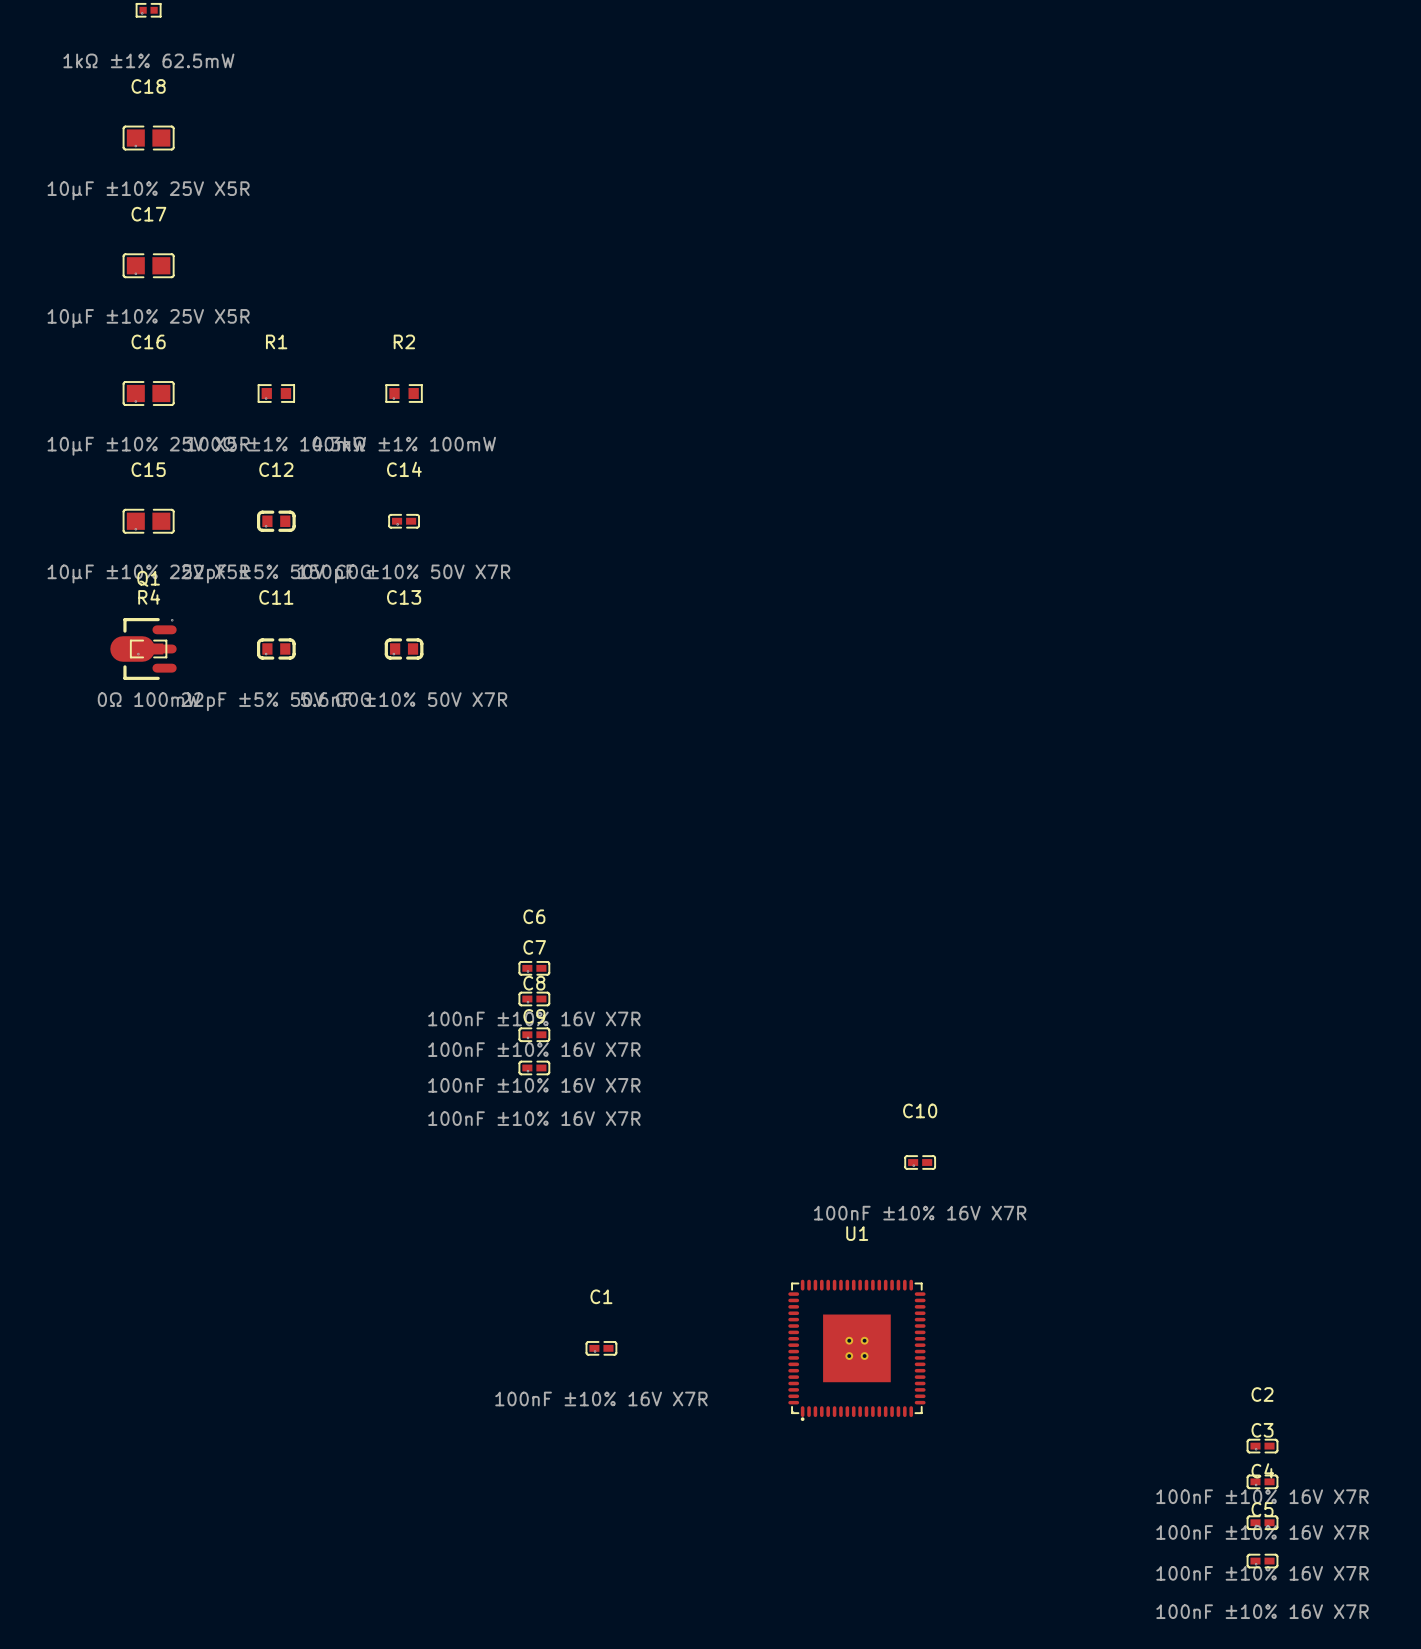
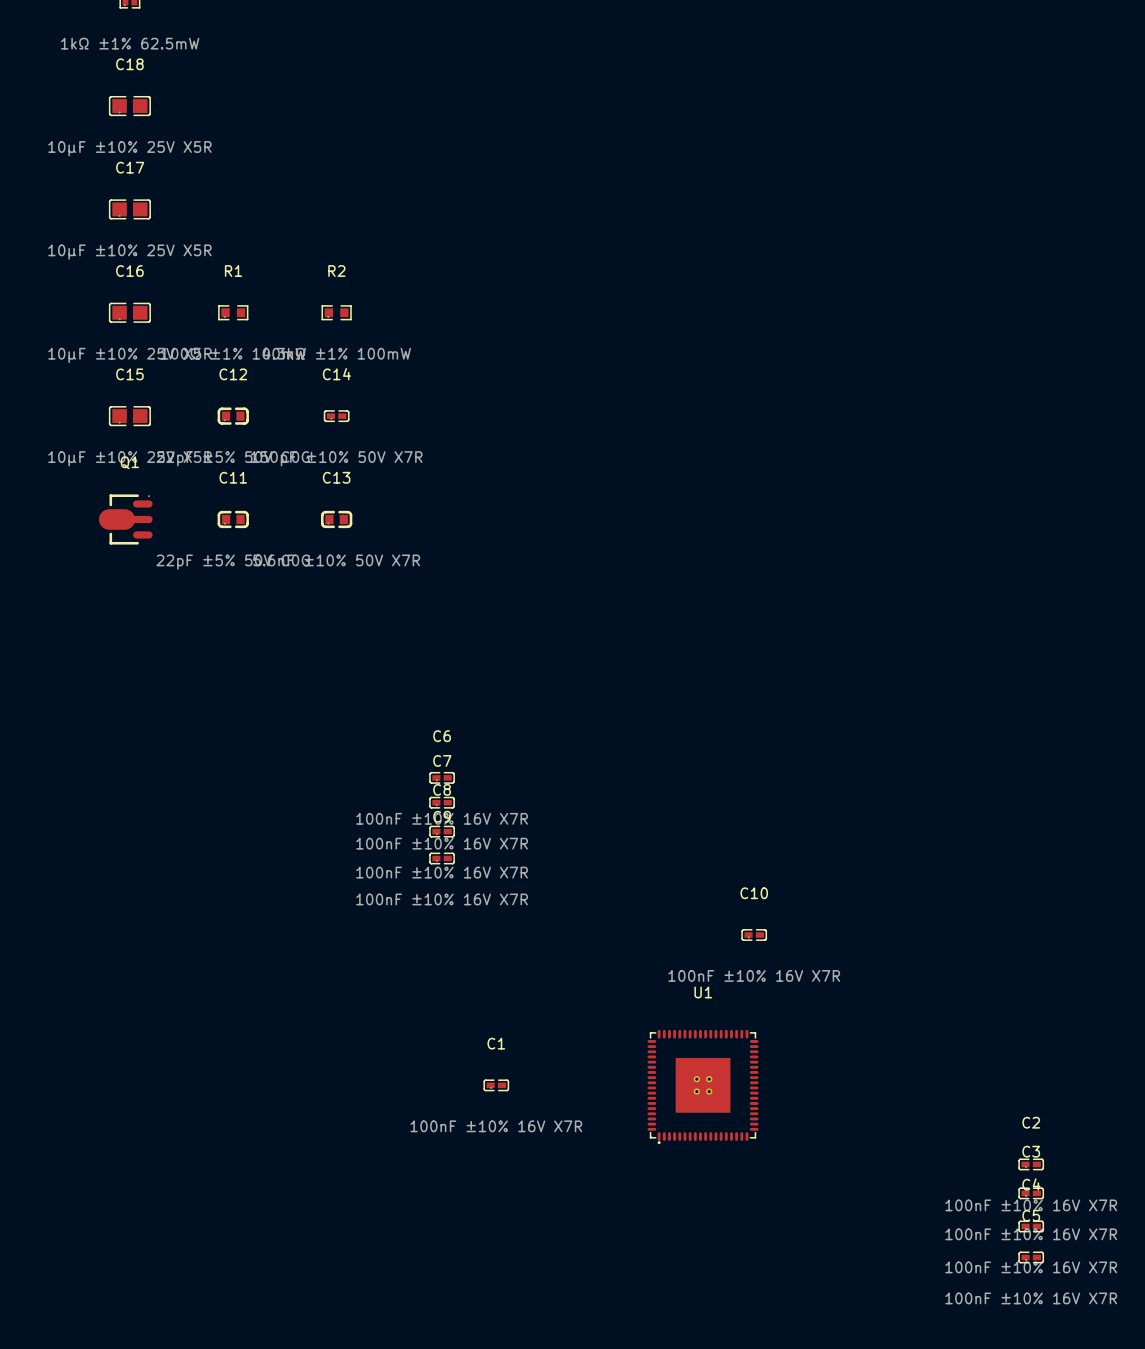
R4: 0Ω 100mW (148, 648) -> none

